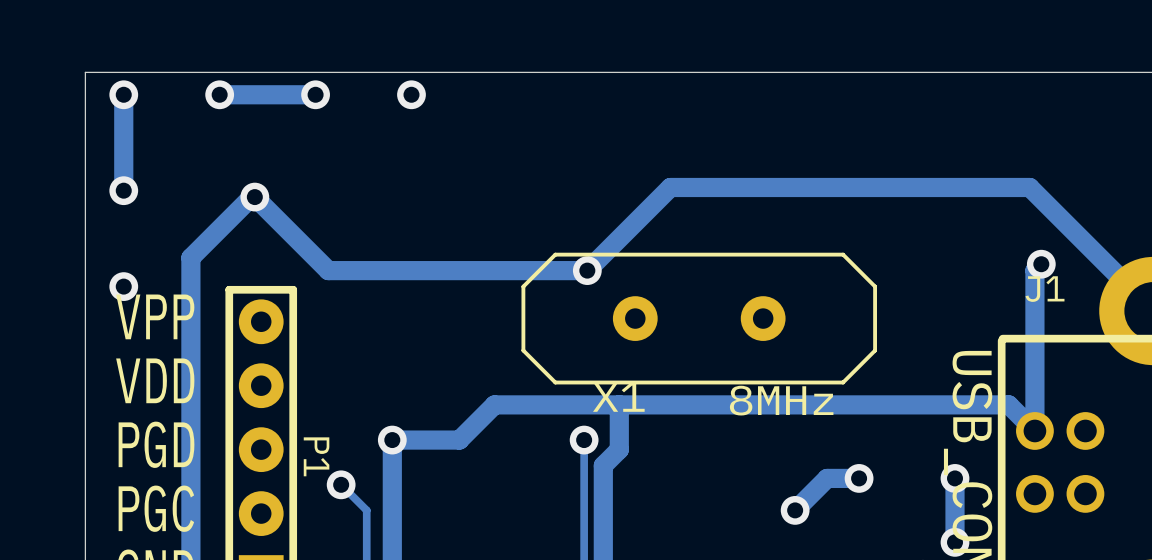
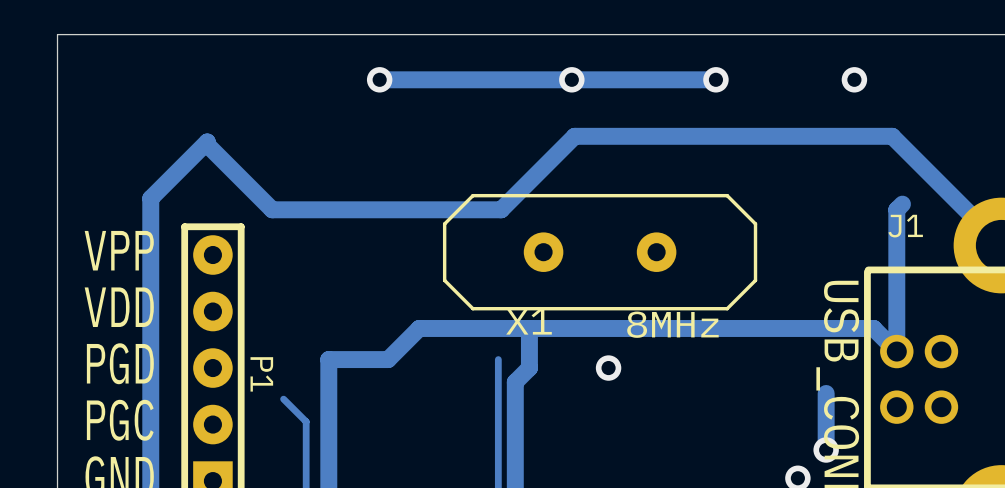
track: (123, 94) (123, 190) -> none
via: (123, 94) -> none
via: (219, 94) -> none
track: (315, 94) (219, 94) -> none
via: (315, 94) -> none
via position: (411, 94) -> (379, 79)
via: none -> (571, 79)
track: none -> (715, 79) (379, 79)
via: none -> (715, 79)
via: none -> (854, 79)
via: (123, 190) -> none
via: (254, 197) -> none
via: (1041, 264) -> none
via: (587, 270) -> none
via: (123, 286) -> none
via: (392, 440) -> none
via: (584, 440) -> none
via: none -> (608, 368)
track: (859, 478) (827, 478) (795, 510) -> none
via: (859, 478) -> none
via: (955, 478) -> none
via: (341, 484) -> none
via: (795, 510) -> none

